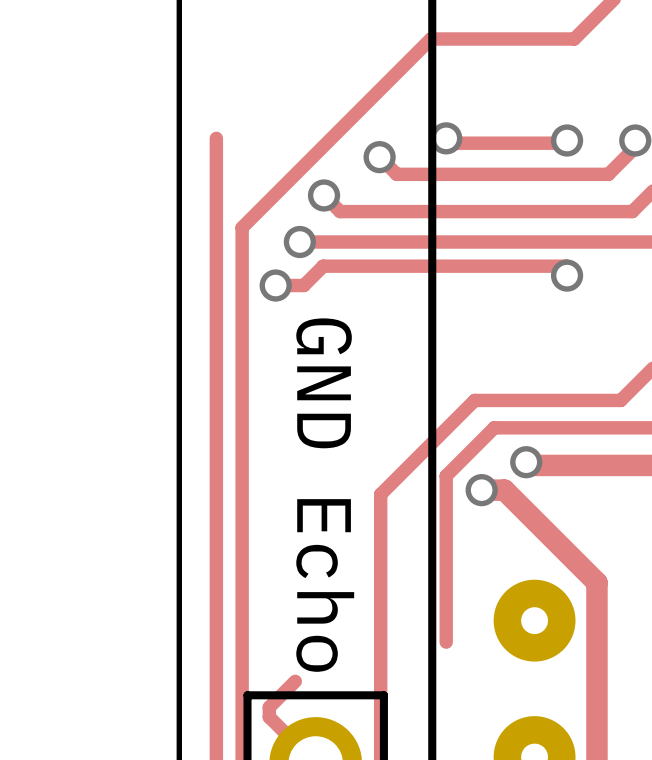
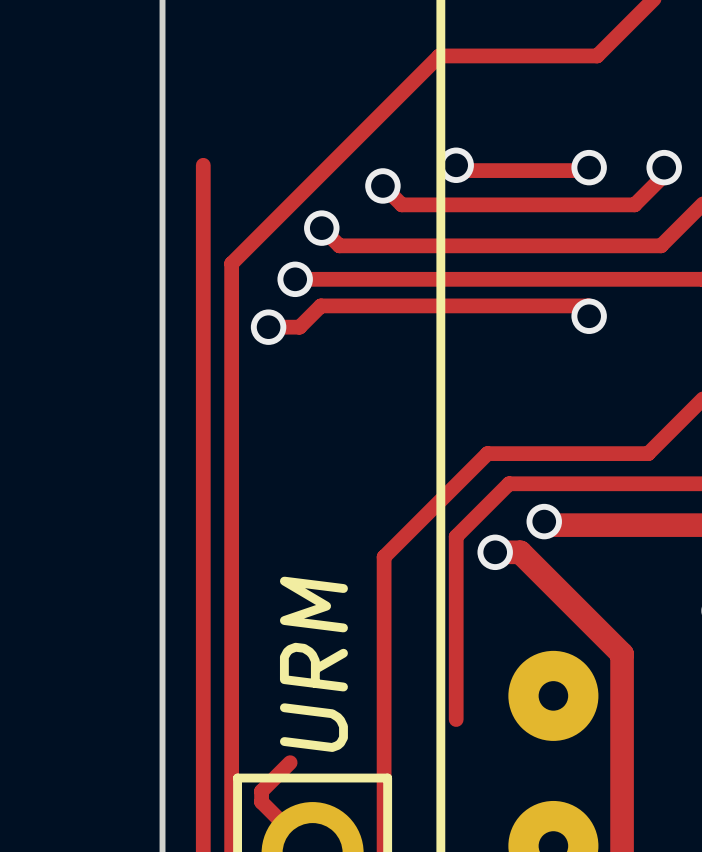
text: GND (324, 383) -> none
text: Echo (325, 585) -> none
URM name: none -> URM (313, 664)

